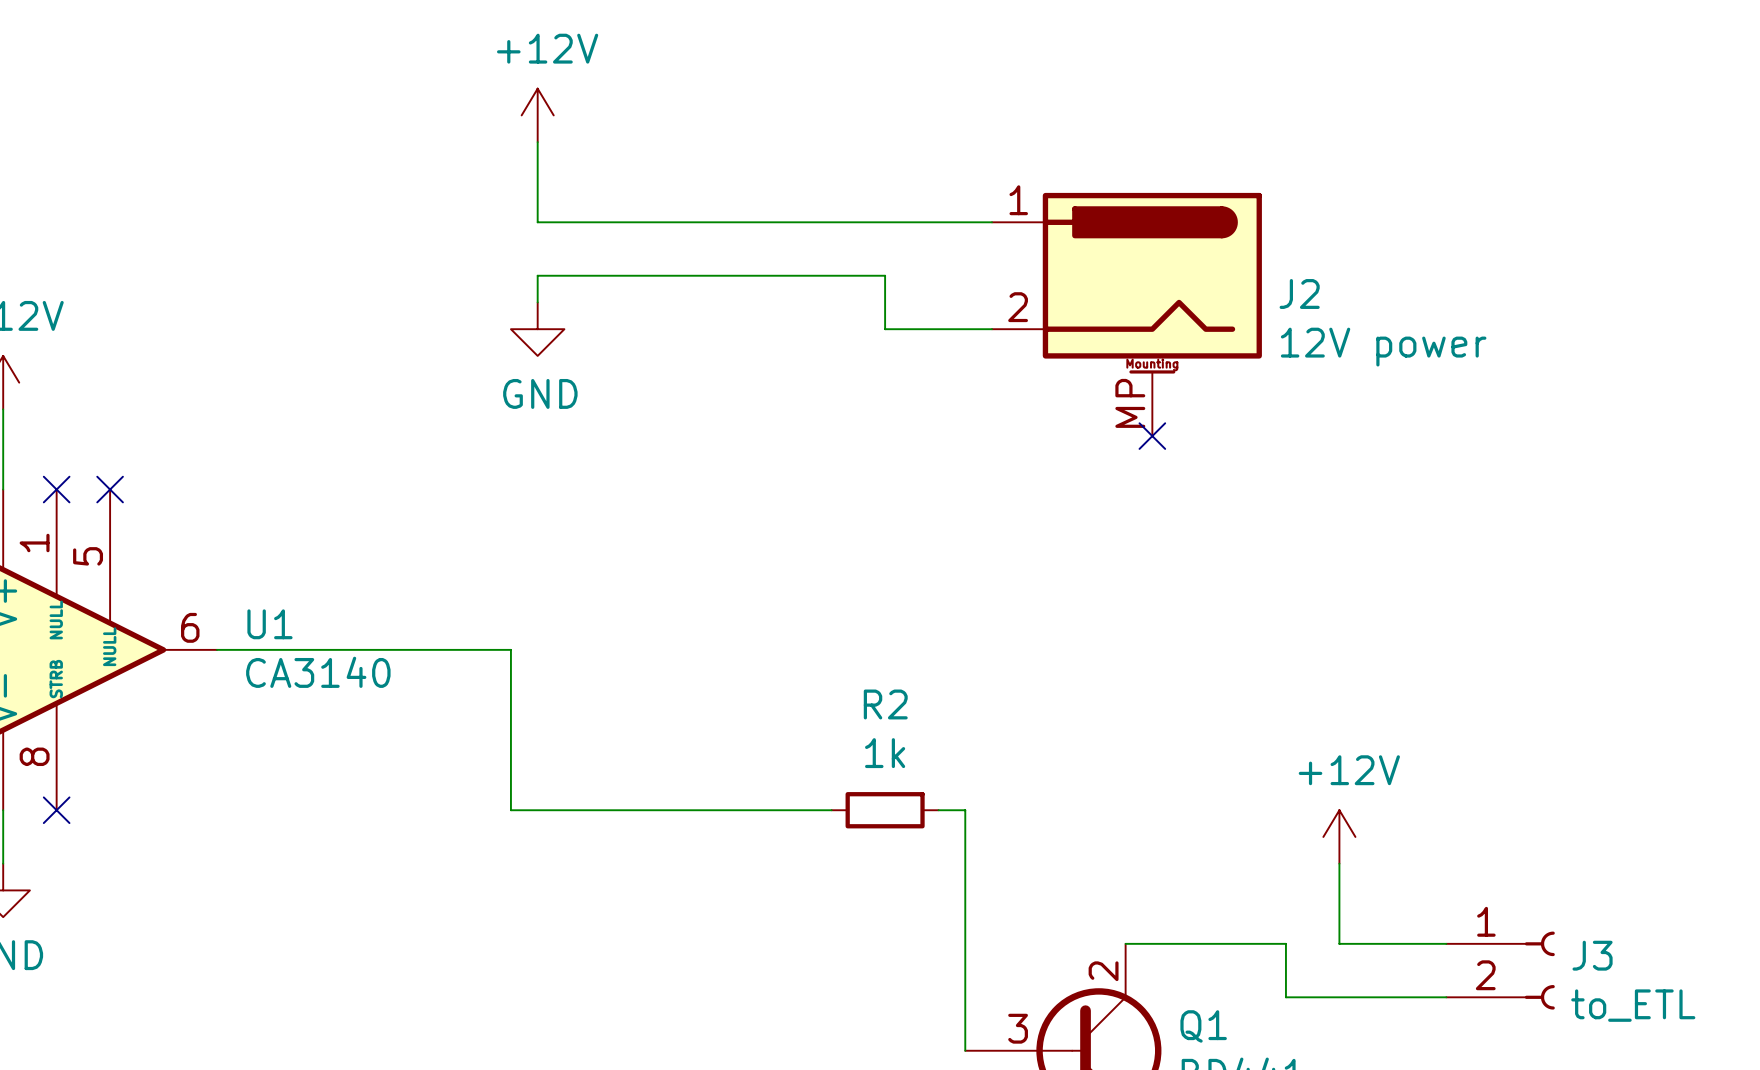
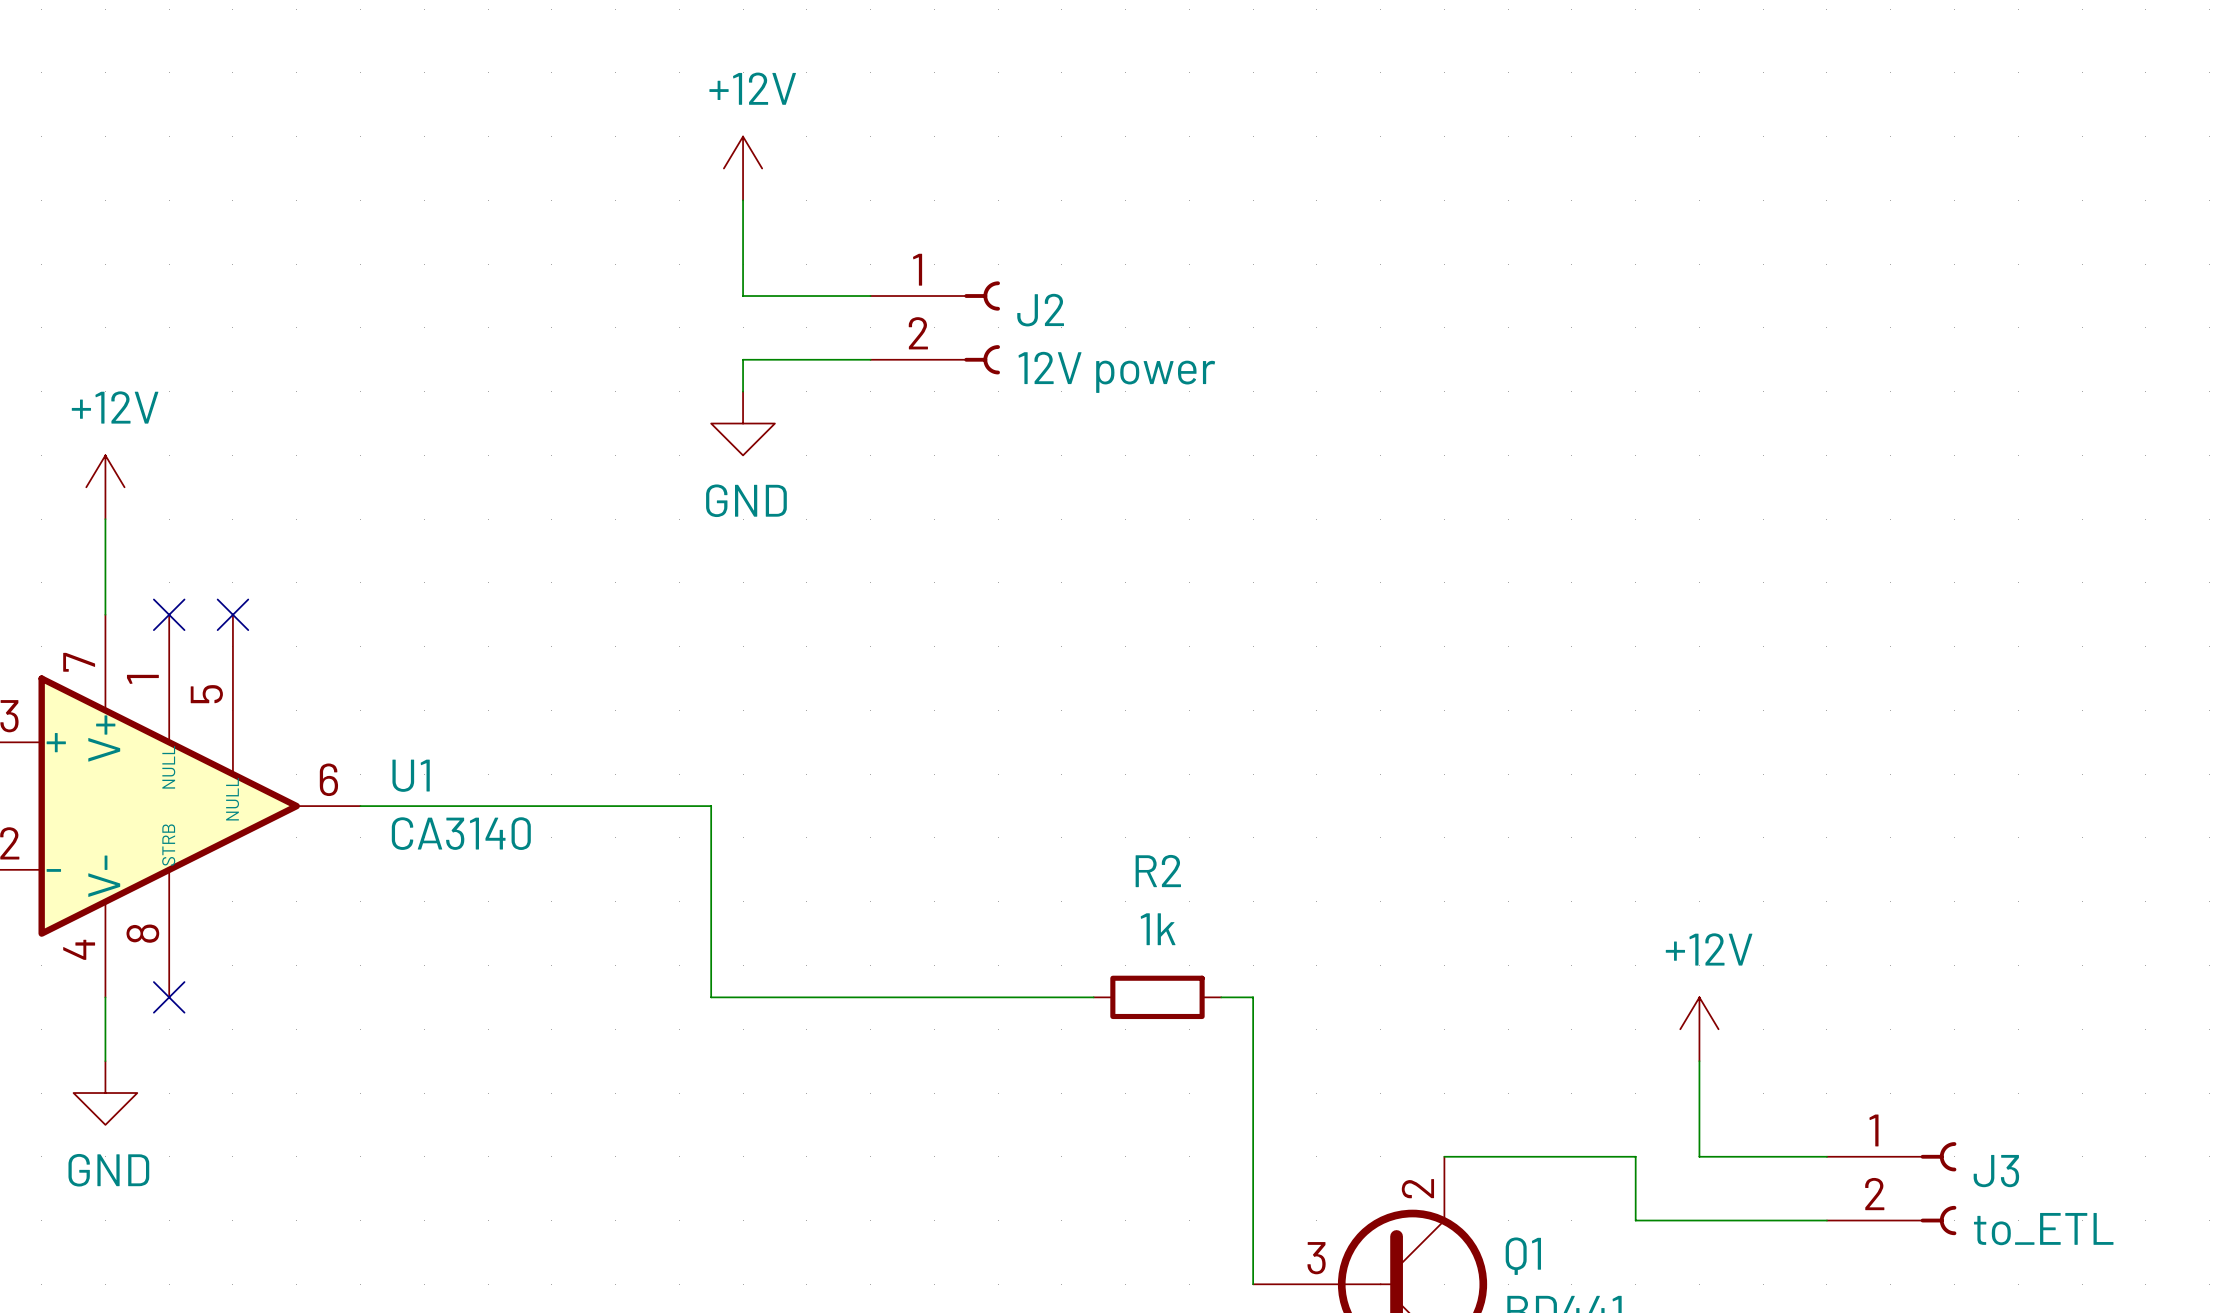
J2 symbol: [992, 192, 1262, 437] -> [870, 281, 1000, 375]
wire: (644, 222) (992, 222) -> none
wire: (644, 275) (885, 275) (885, 329) (992, 329) -> none
J2 name position: J2 (1299, 293) -> J2 (1040, 310)
J2 value position: 12V power (1383, 347) -> 12V power (1116, 372)
no-connect mark: (1152, 436) -> none

